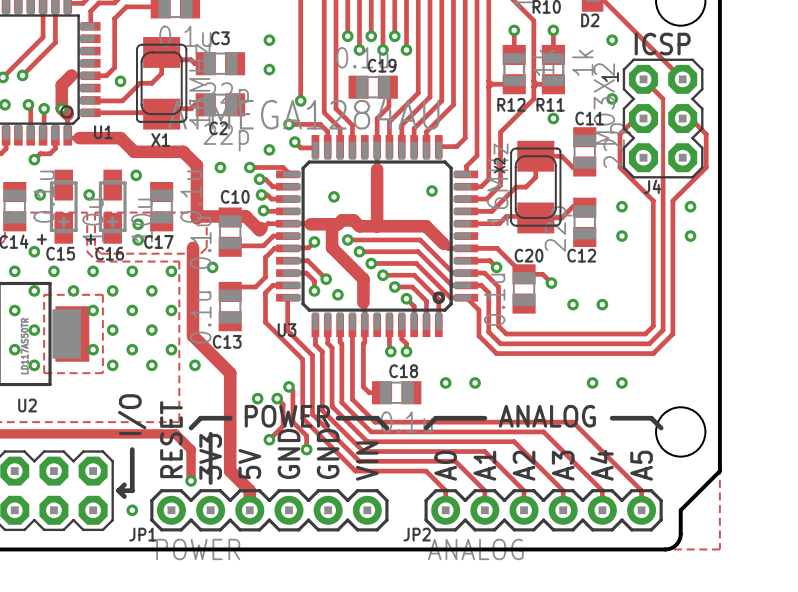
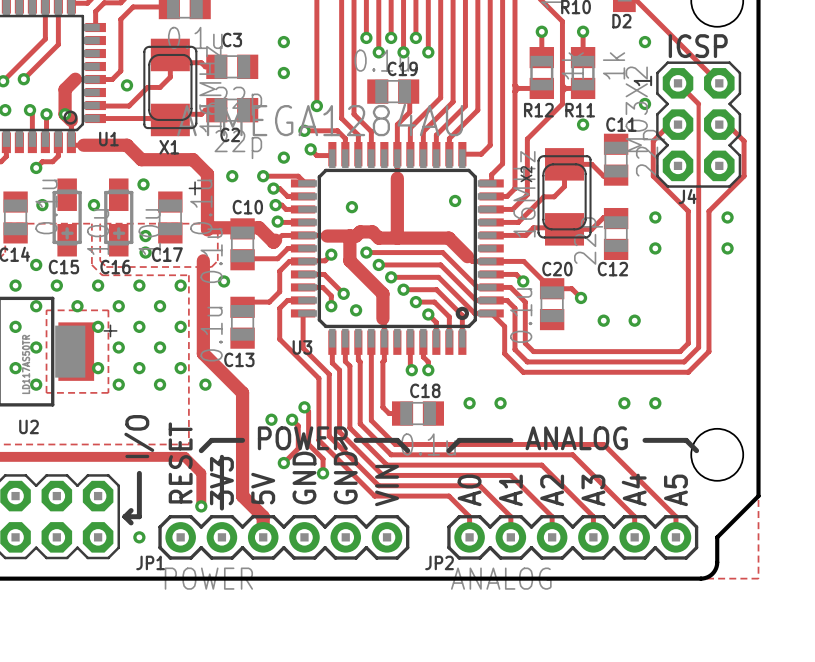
text: none -> + (195, 188)
text: + (41, 239) -> none
text: + (90, 239) -> none
text: none -> + (110, 330)

